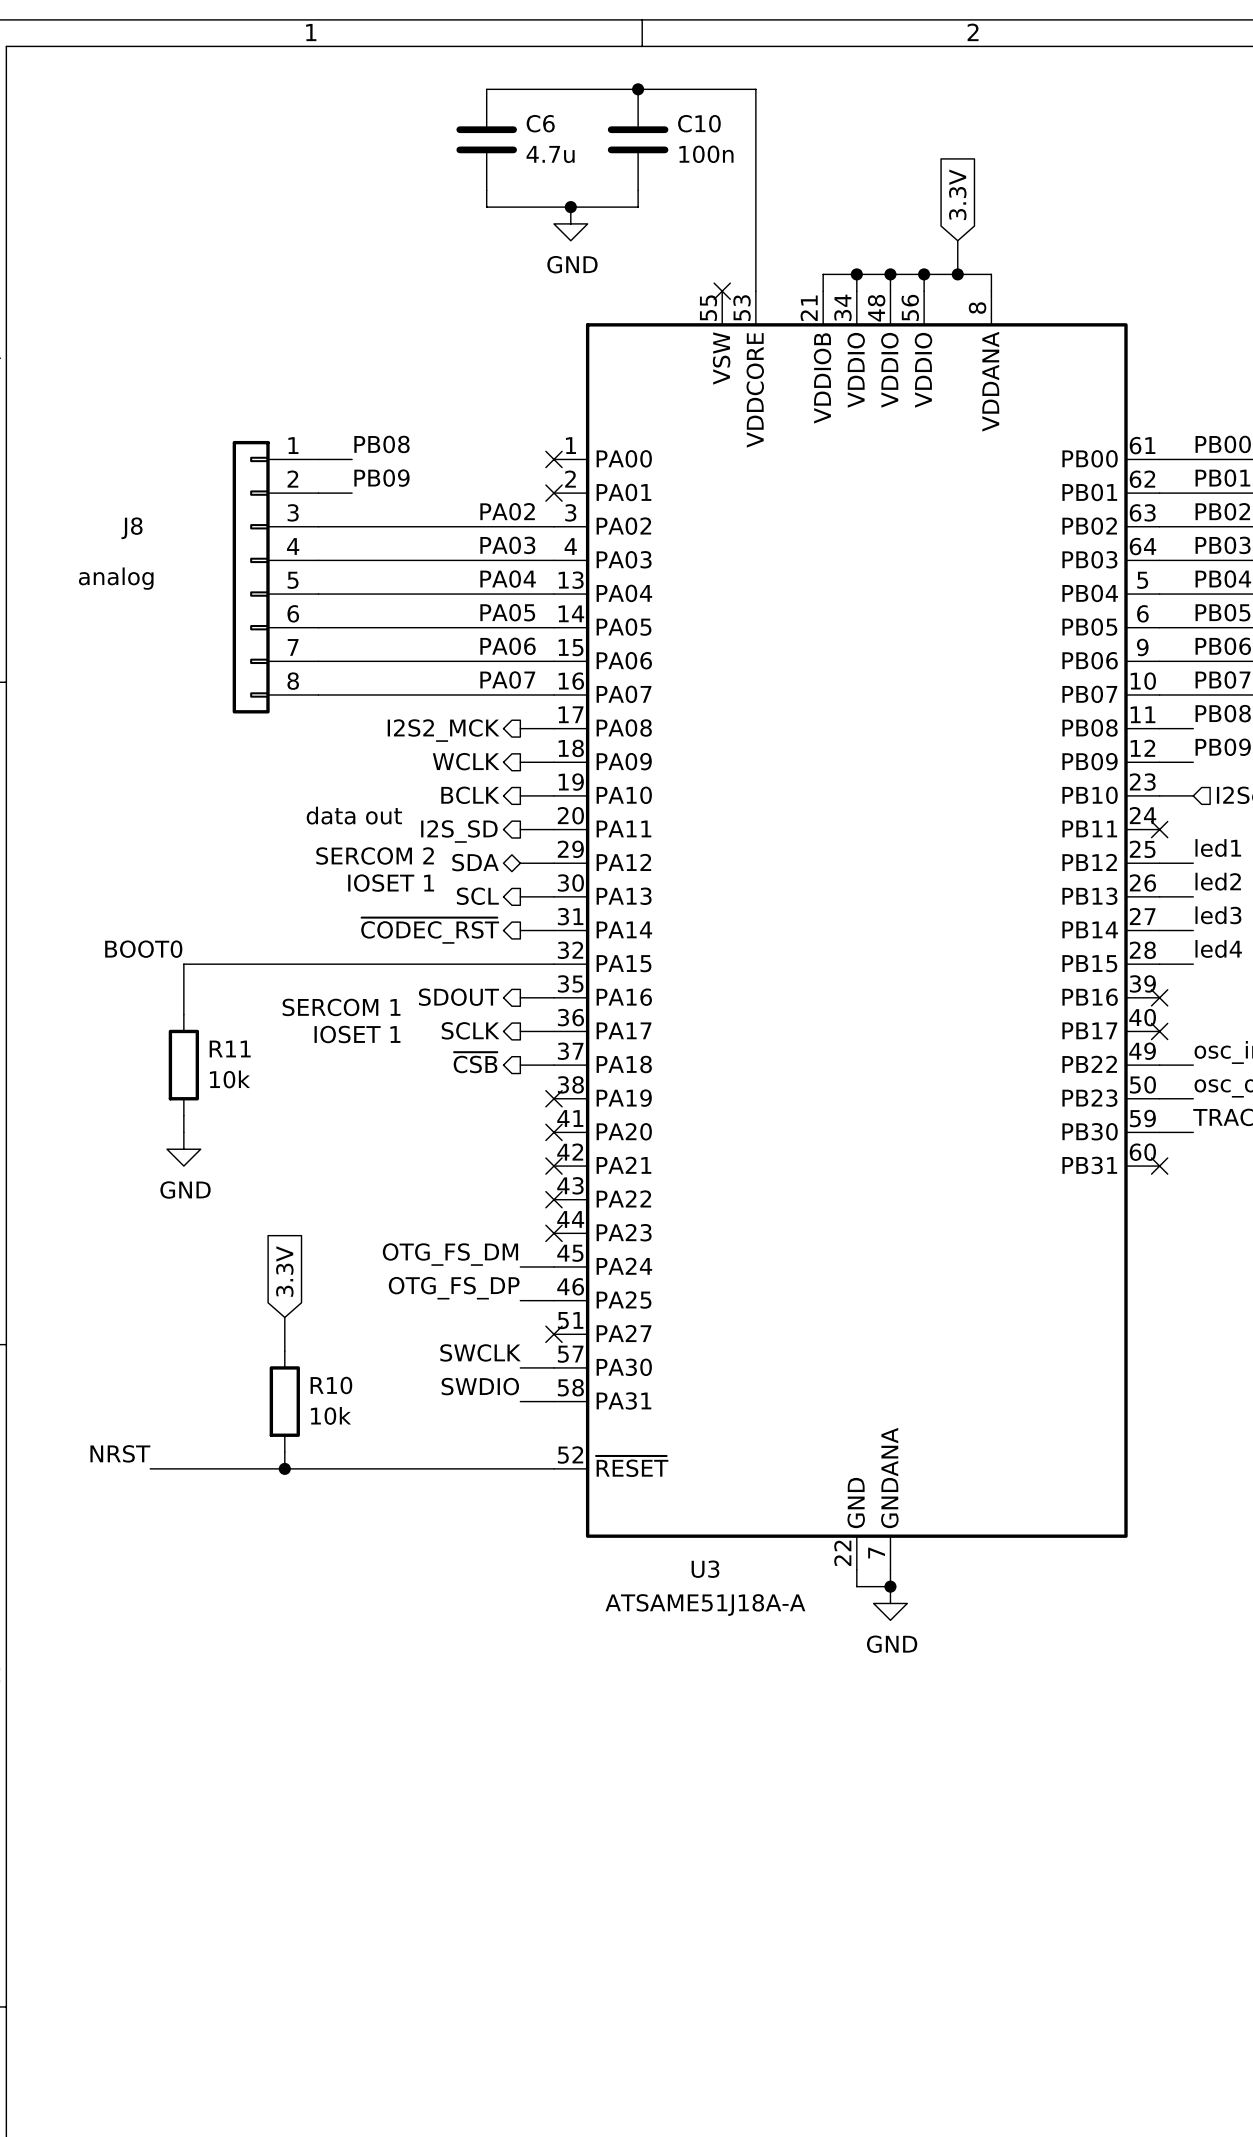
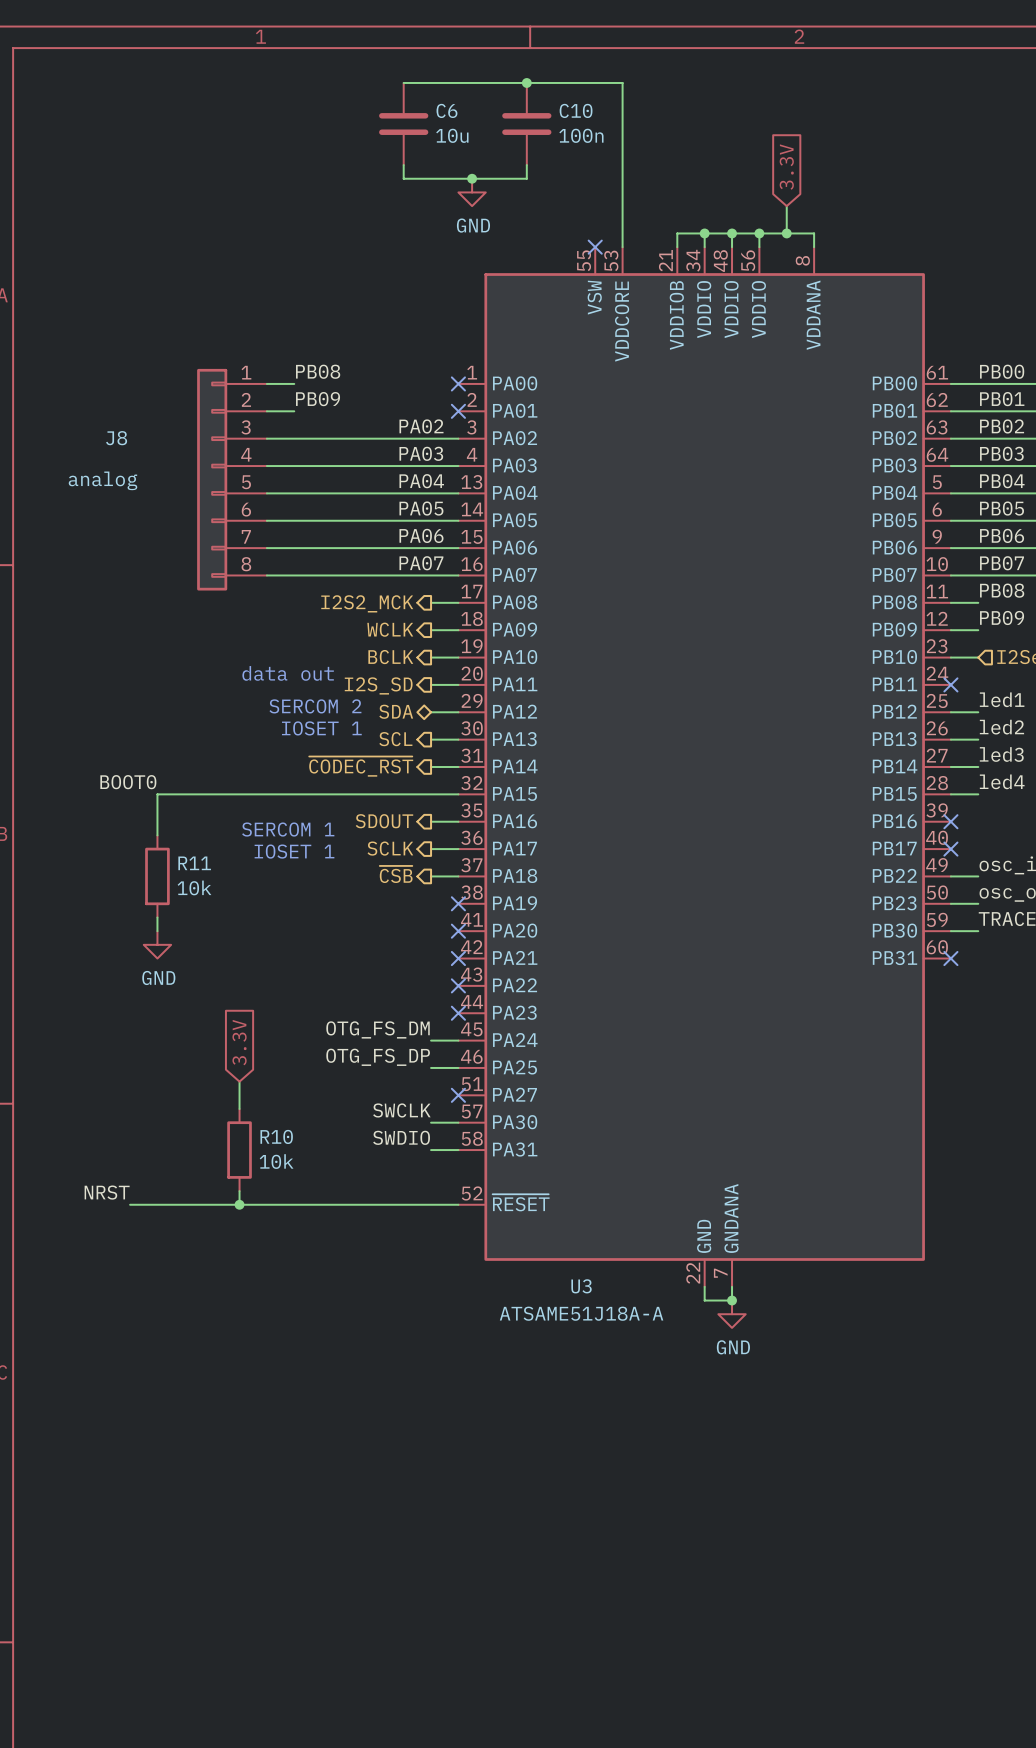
C6 value: 4.7u (550, 154) -> 10u (452, 135)

